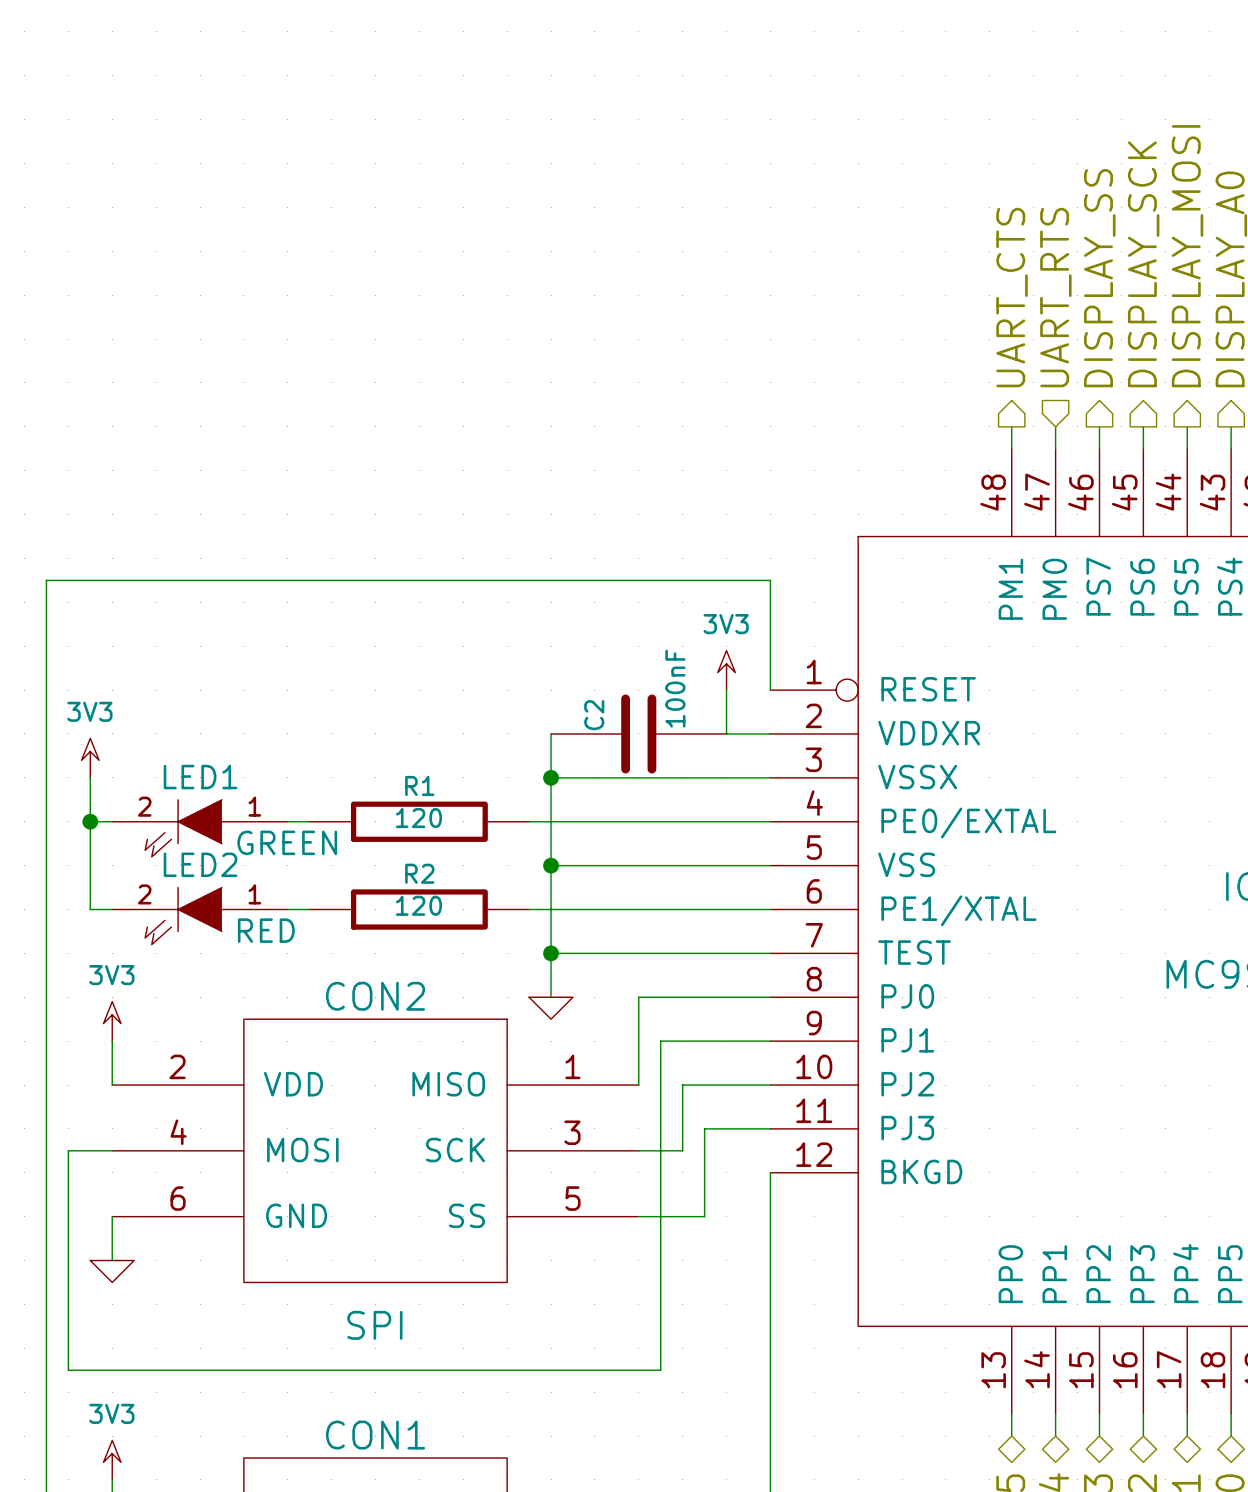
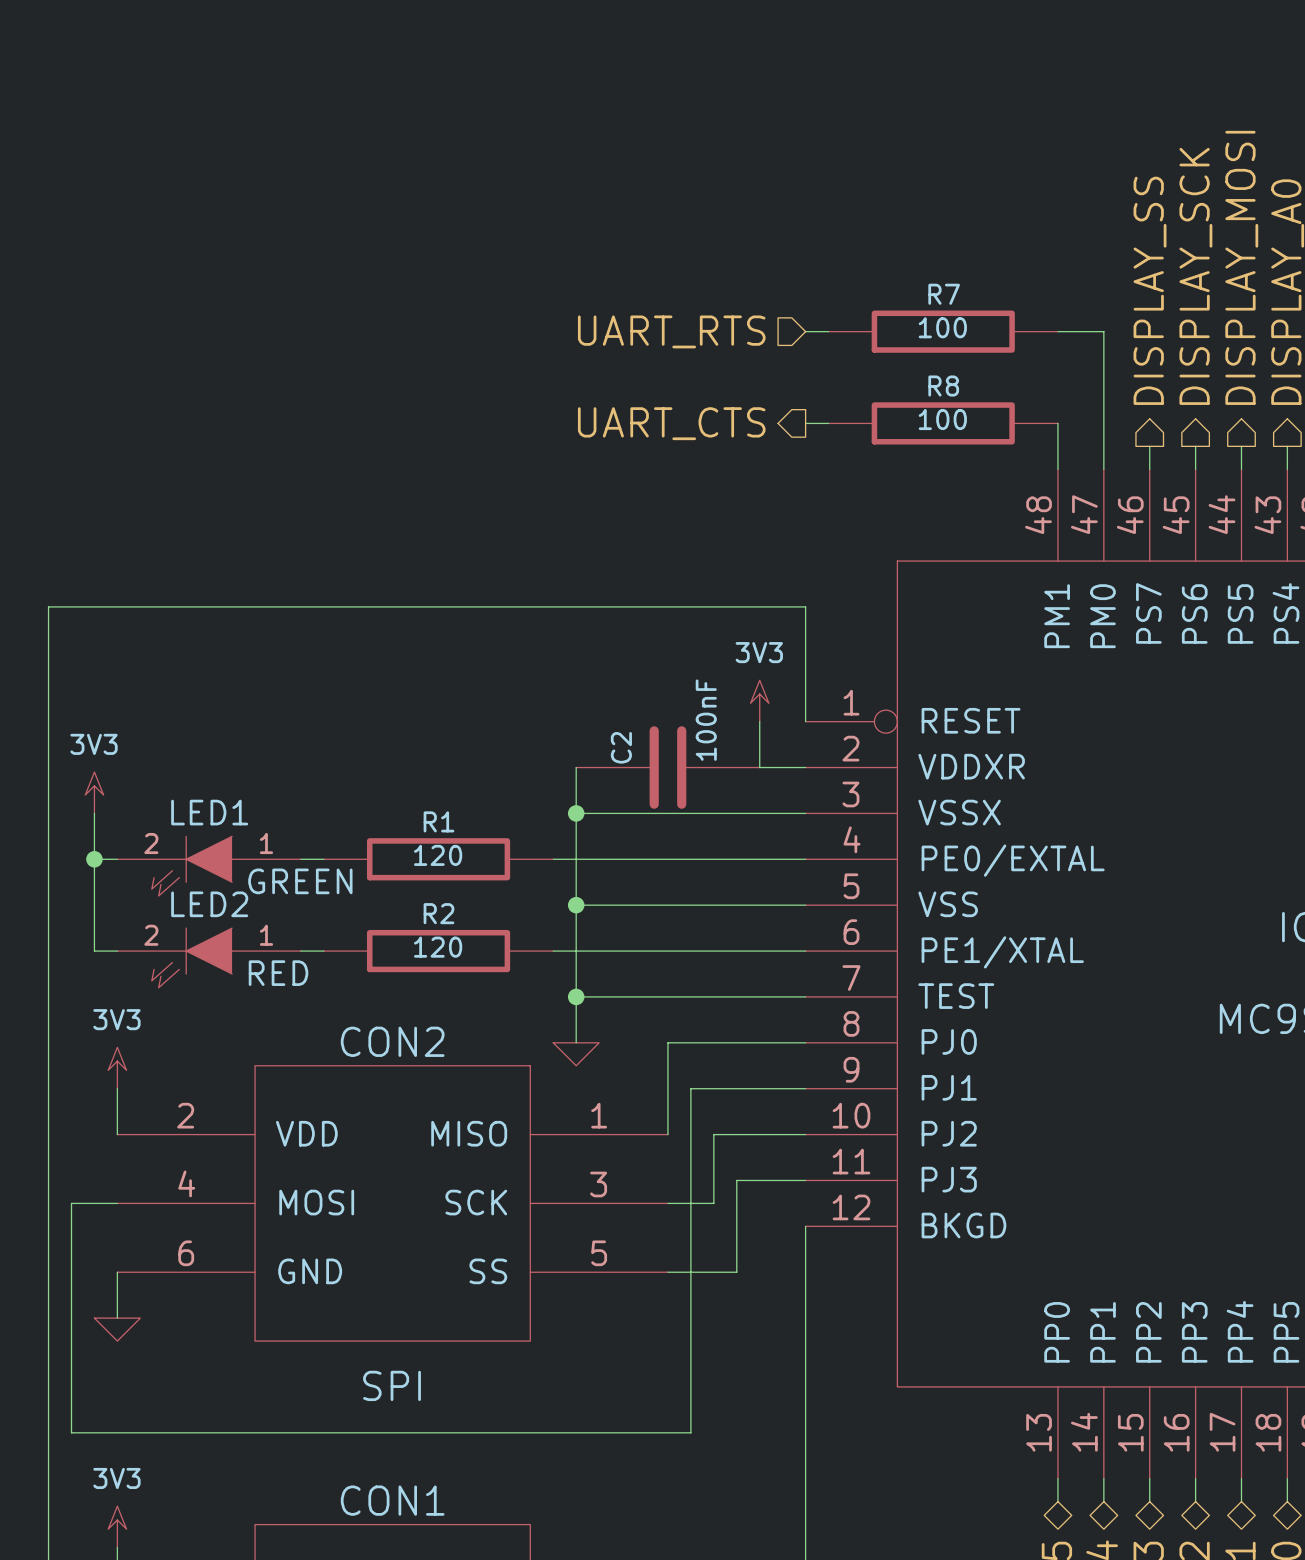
hierarchical label rotation: 0° (1012, 297) -> 90° counterclockwise (671, 423)
hierarchical label position: UART_CTS (1012, 297) -> UART_CTS (671, 423)
hierarchical label rotation: 0° (1055, 297) -> 90° counterclockwise (671, 331)
hierarchical label position: UART_RTS (1055, 297) -> UART_RTS (671, 331)
wire: none -> (805, 331) (828, 331)
R7: none -> 100 (943, 331)
wire: none -> (1057, 331) (1103, 331) (1103, 446)
wire: none -> (805, 423) (828, 423)
R8: none -> 100 (943, 423)
wire: none -> (1057, 423) (1057, 446)

